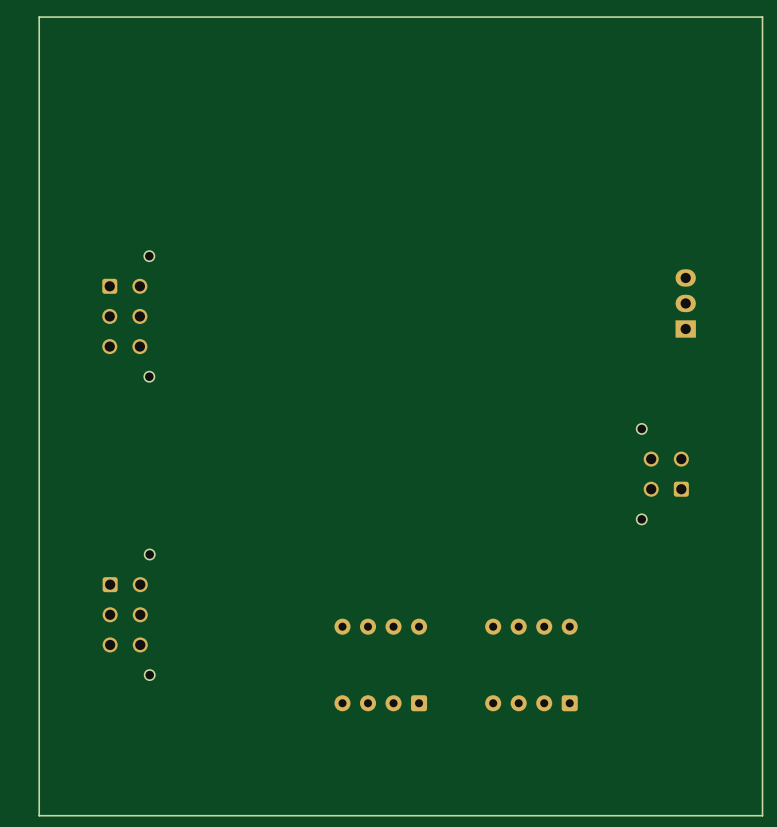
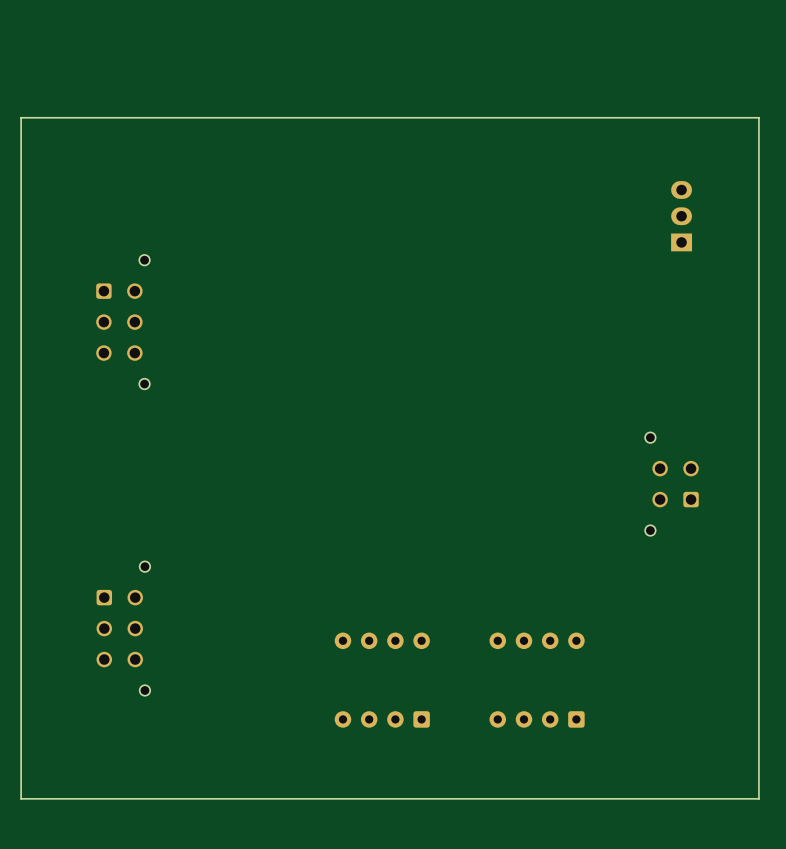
board edge: (762, 17) (39, 17) (39, 815) (762, 815) (762, 17) -> (758, 117) (758, 798) (21, 798) (21, 117) (758, 117)
part position: (685, 303) -> (681, 216)

